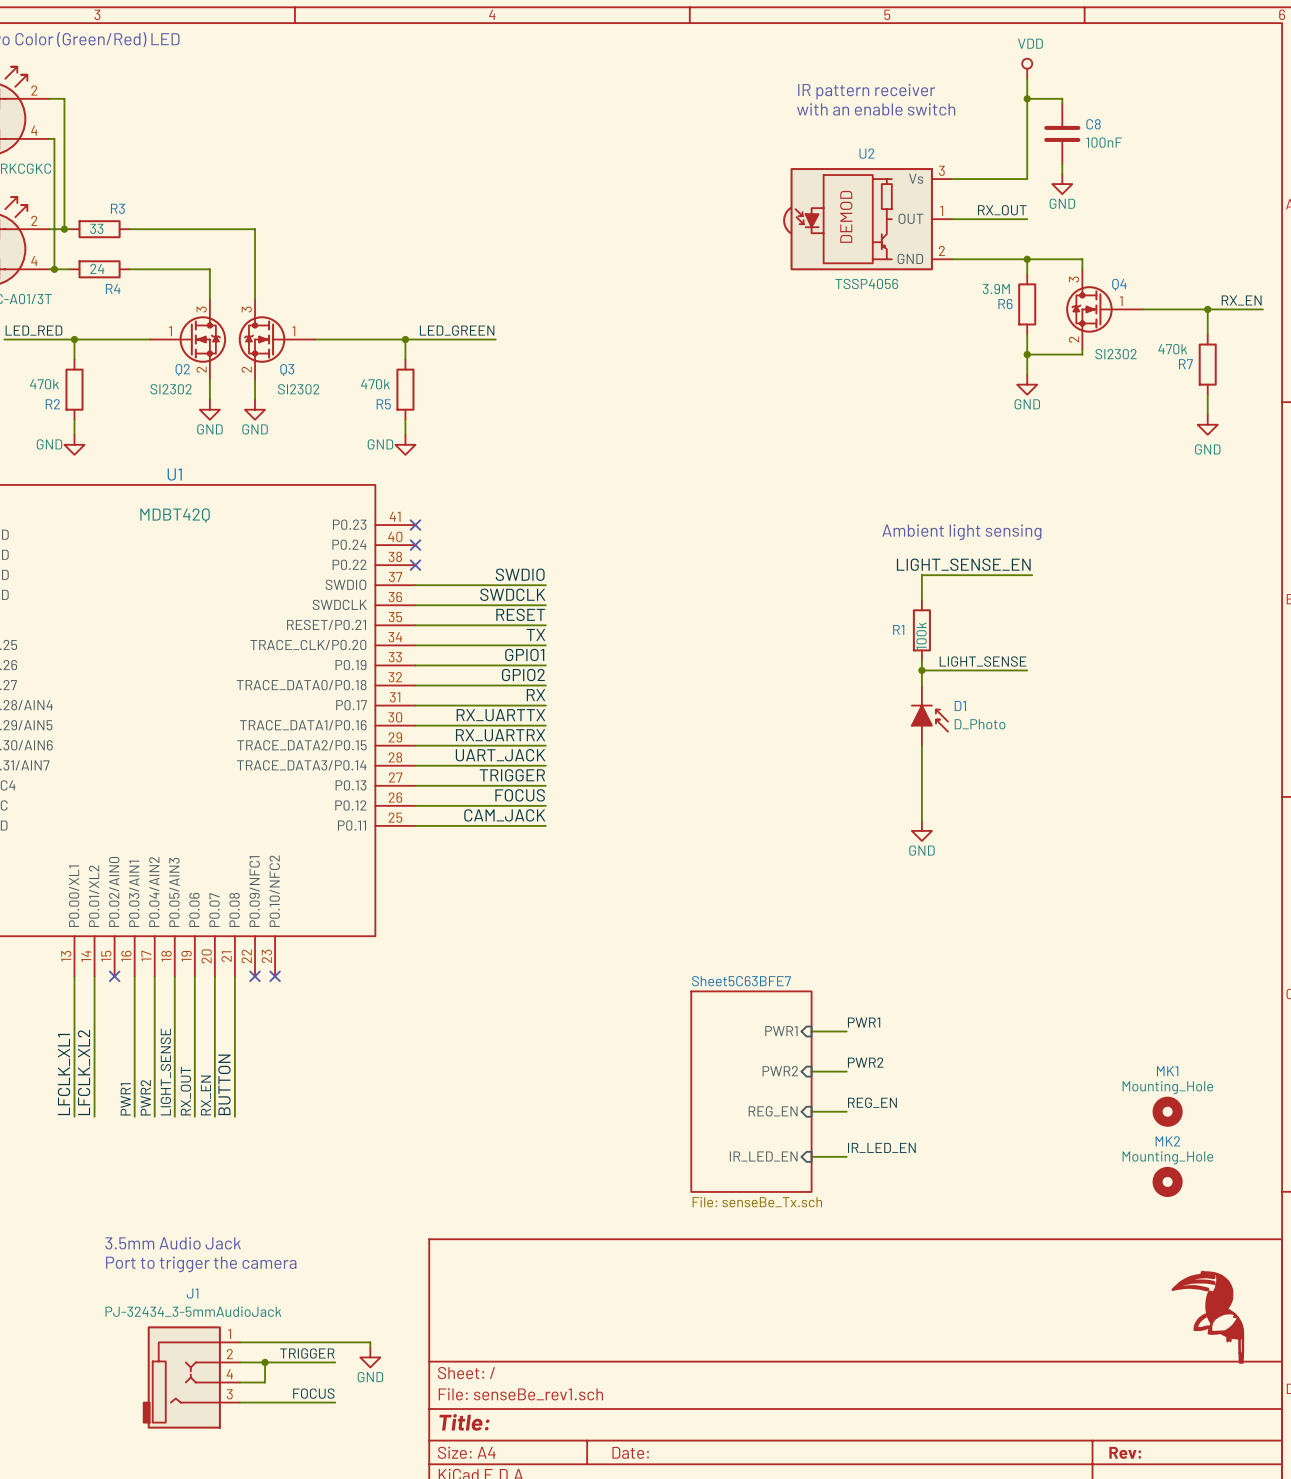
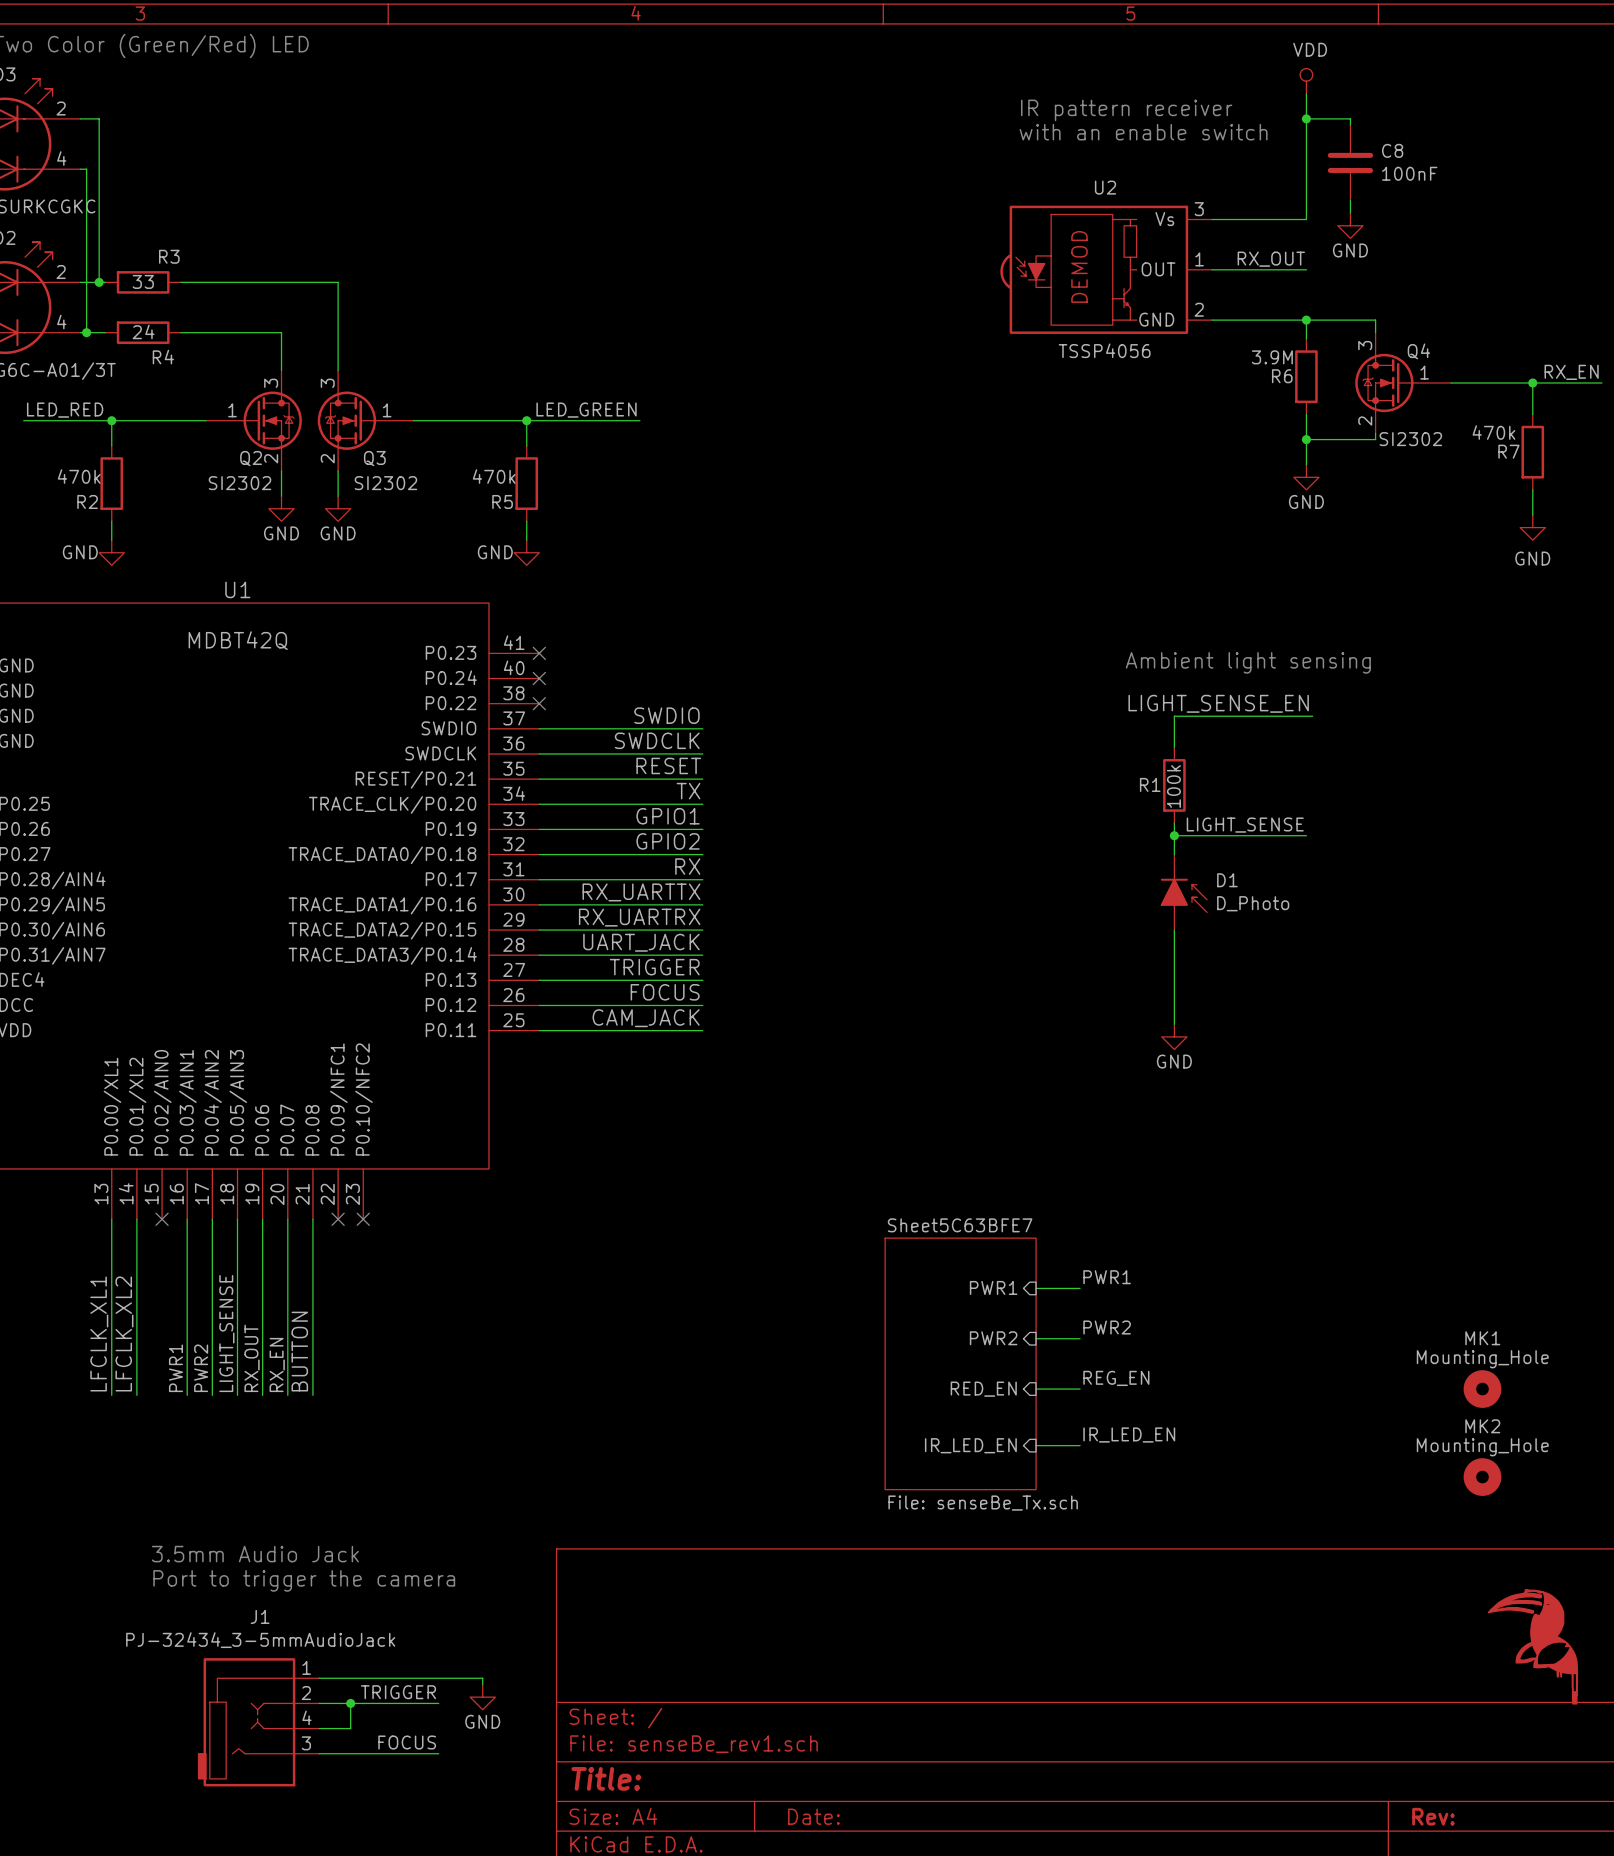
sheet pin: REG_EN (773, 1111) -> RED_EN (983, 1389)

